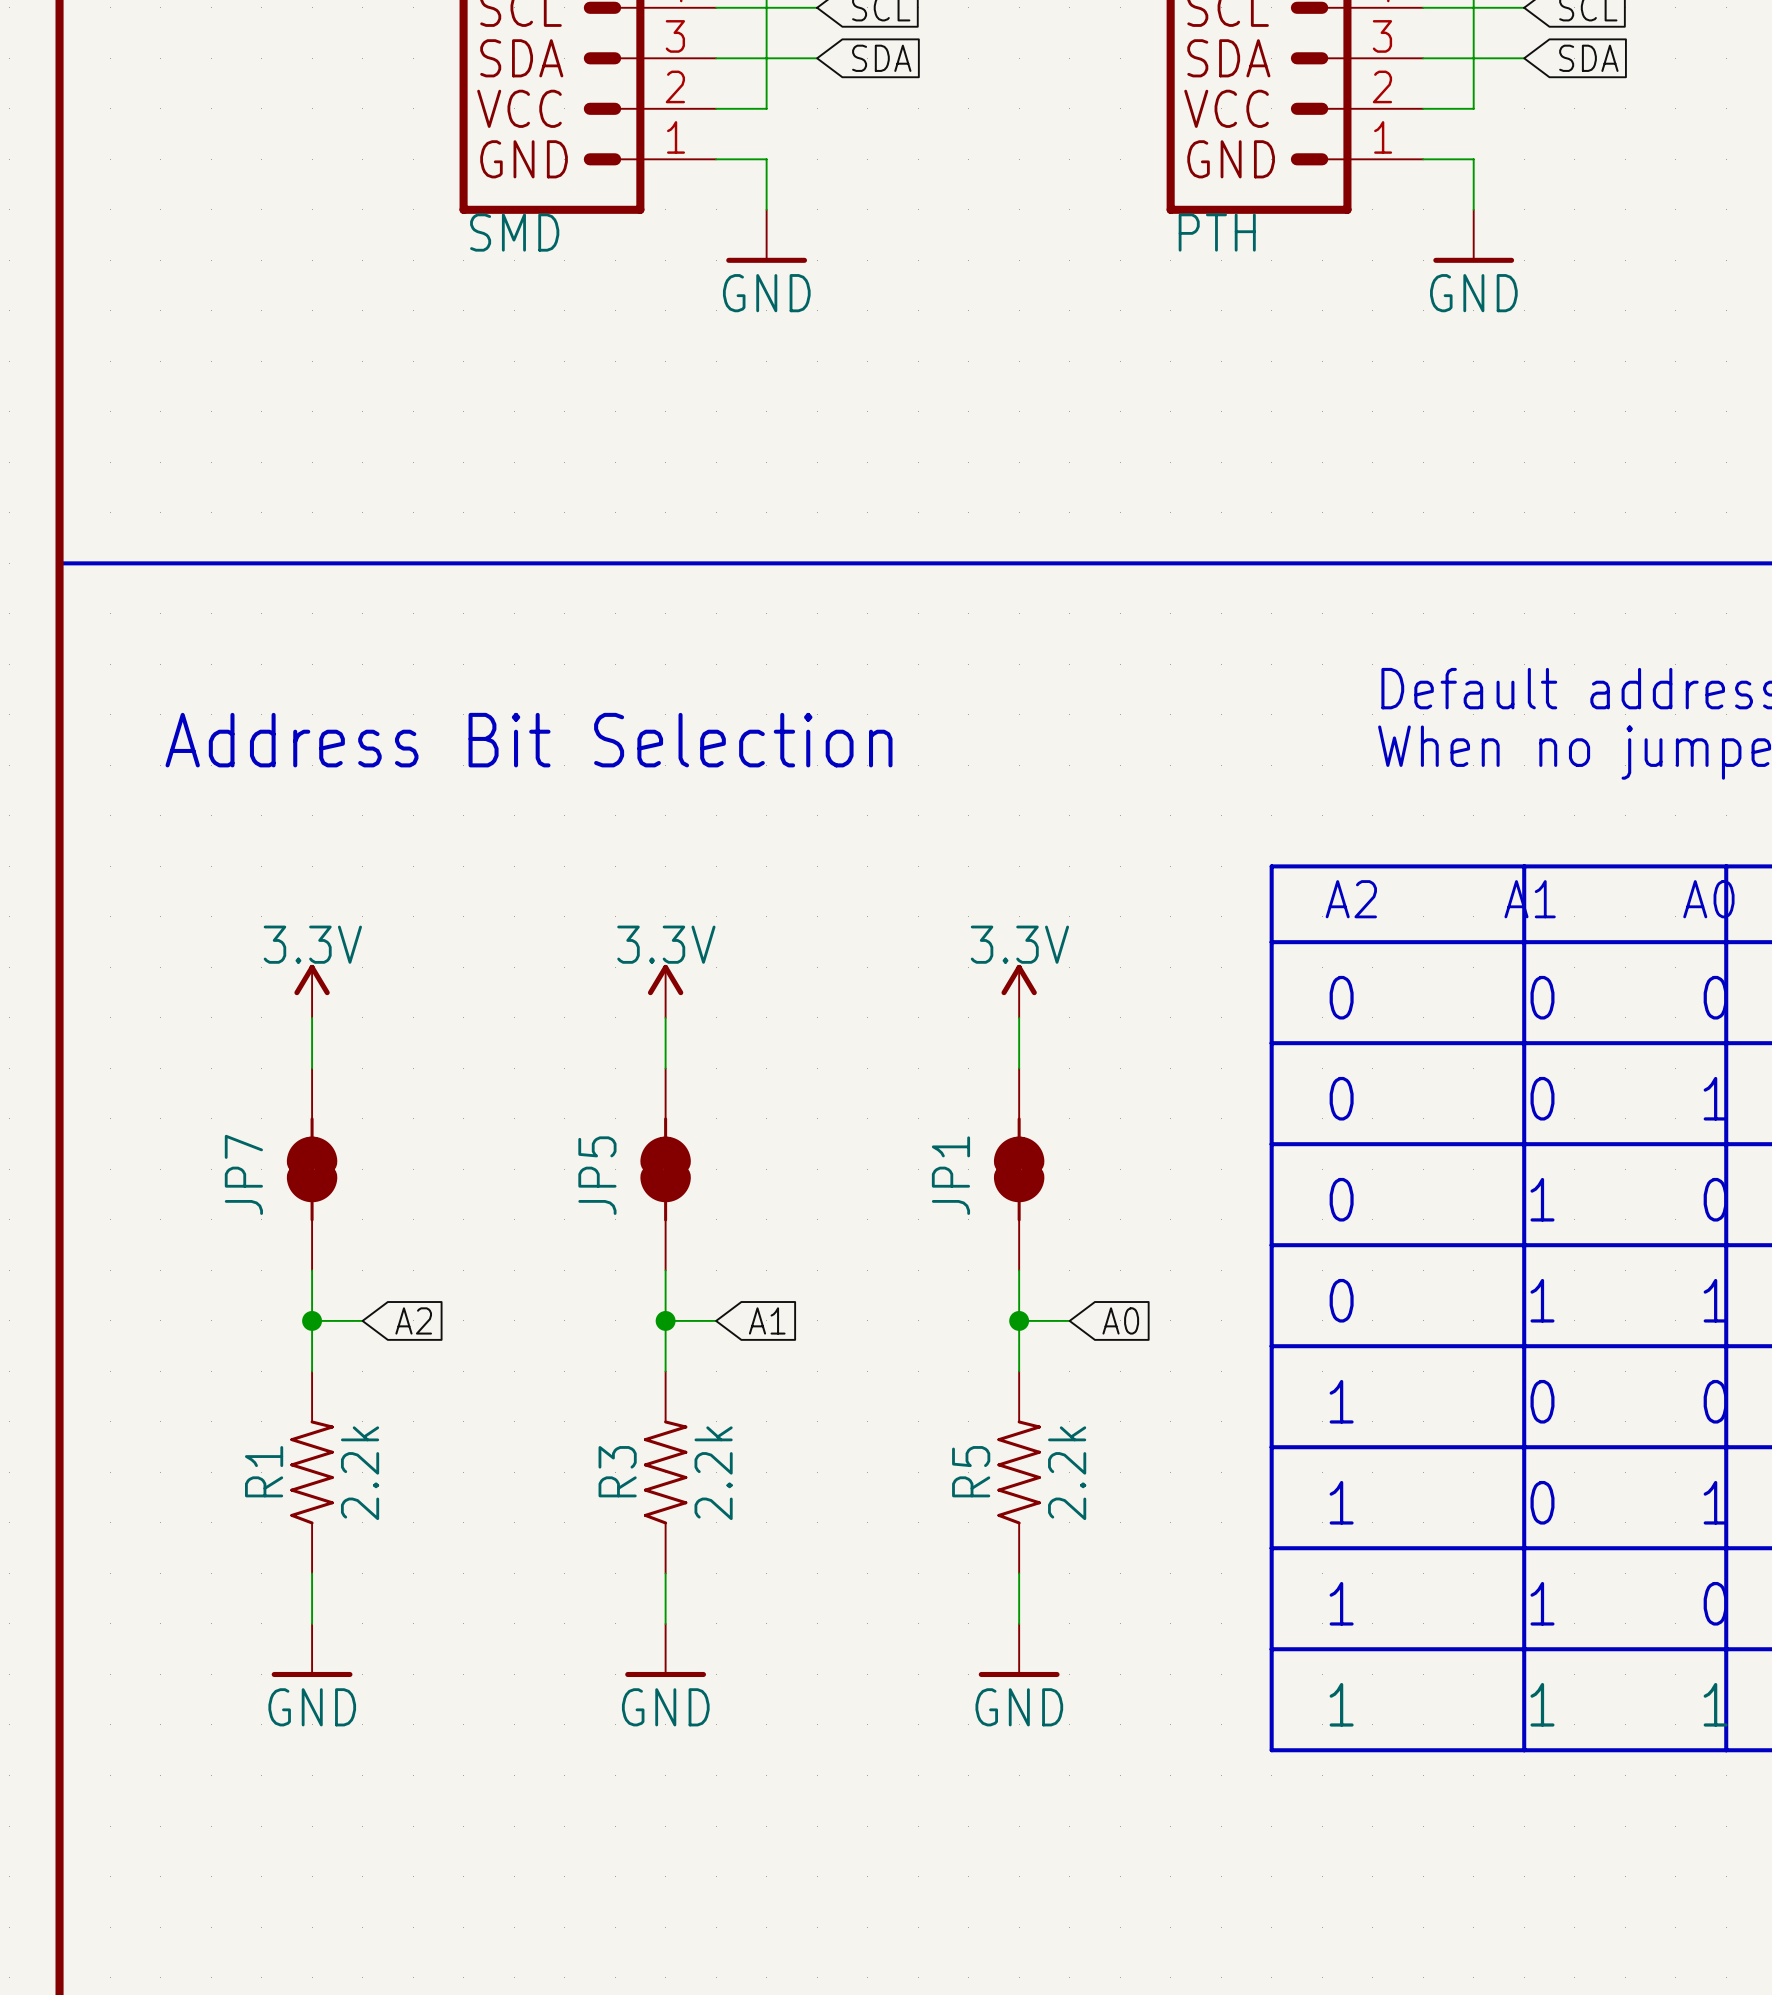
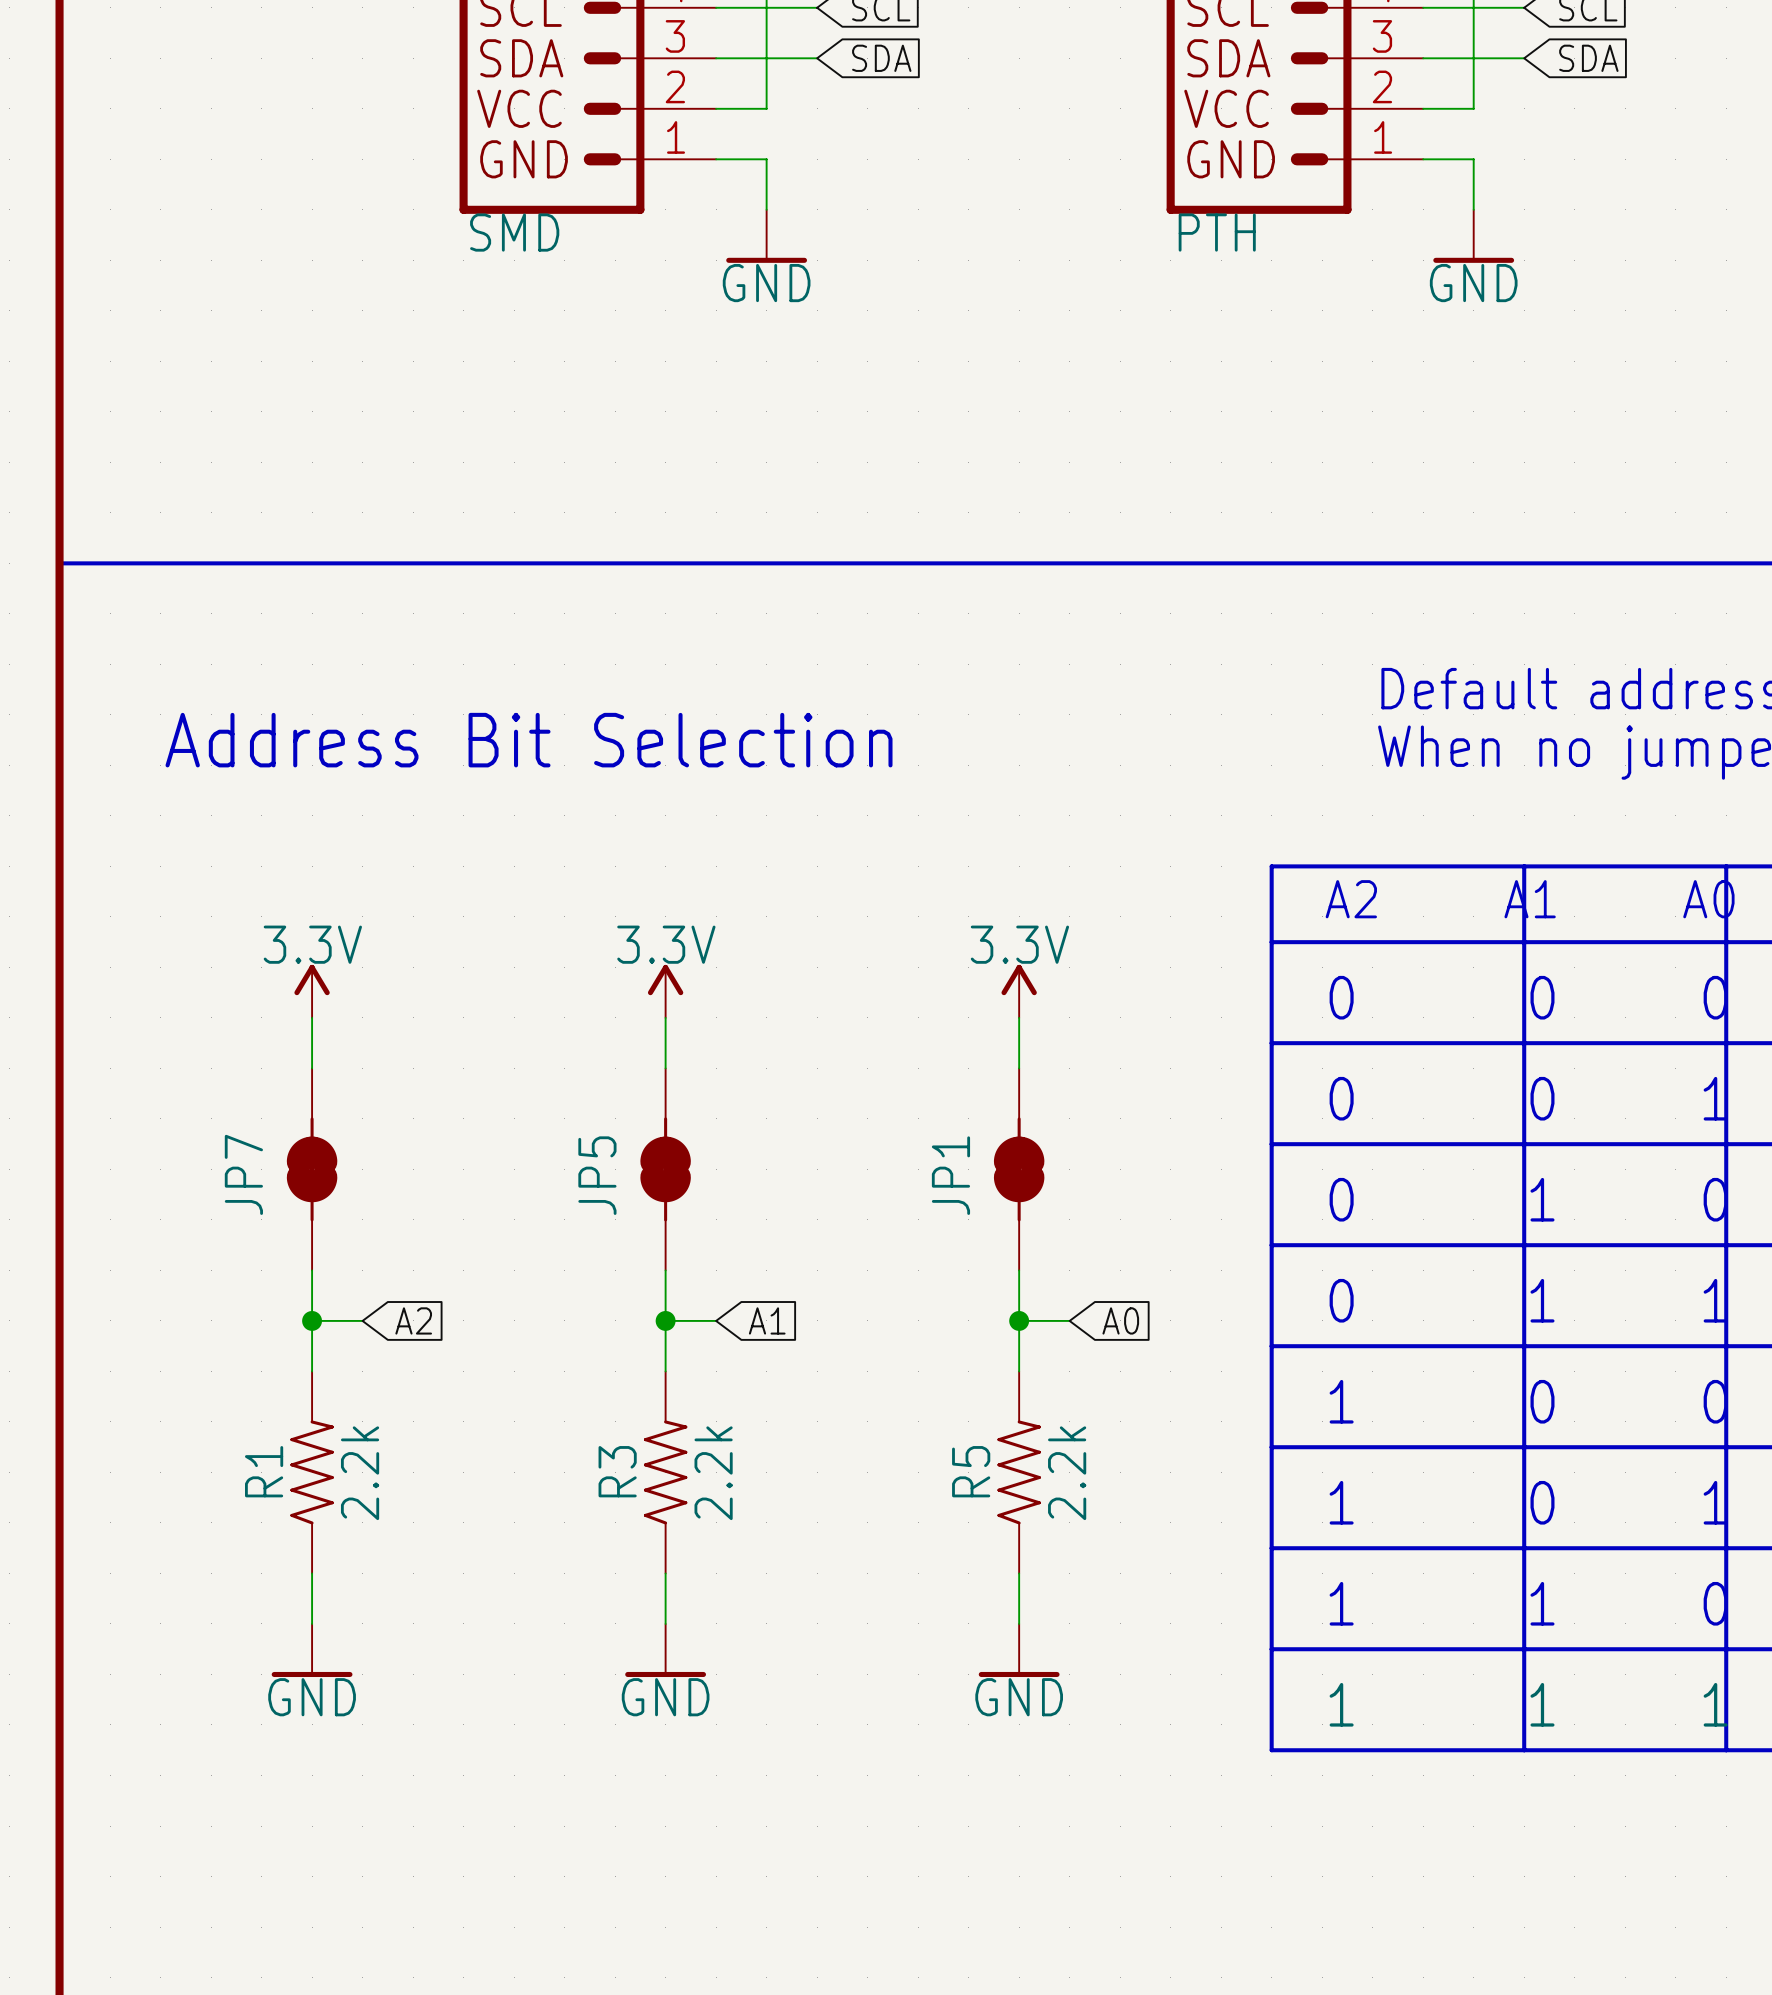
power symbol text position: GND (766, 293) -> GND (766, 283)
power symbol text position: GND (1473, 293) -> GND (1473, 283)
power symbol text position: GND (312, 1707) -> GND (312, 1697)
power symbol text position: GND (665, 1707) -> GND (665, 1697)
power symbol text position: GND (1019, 1707) -> GND (1019, 1697)

